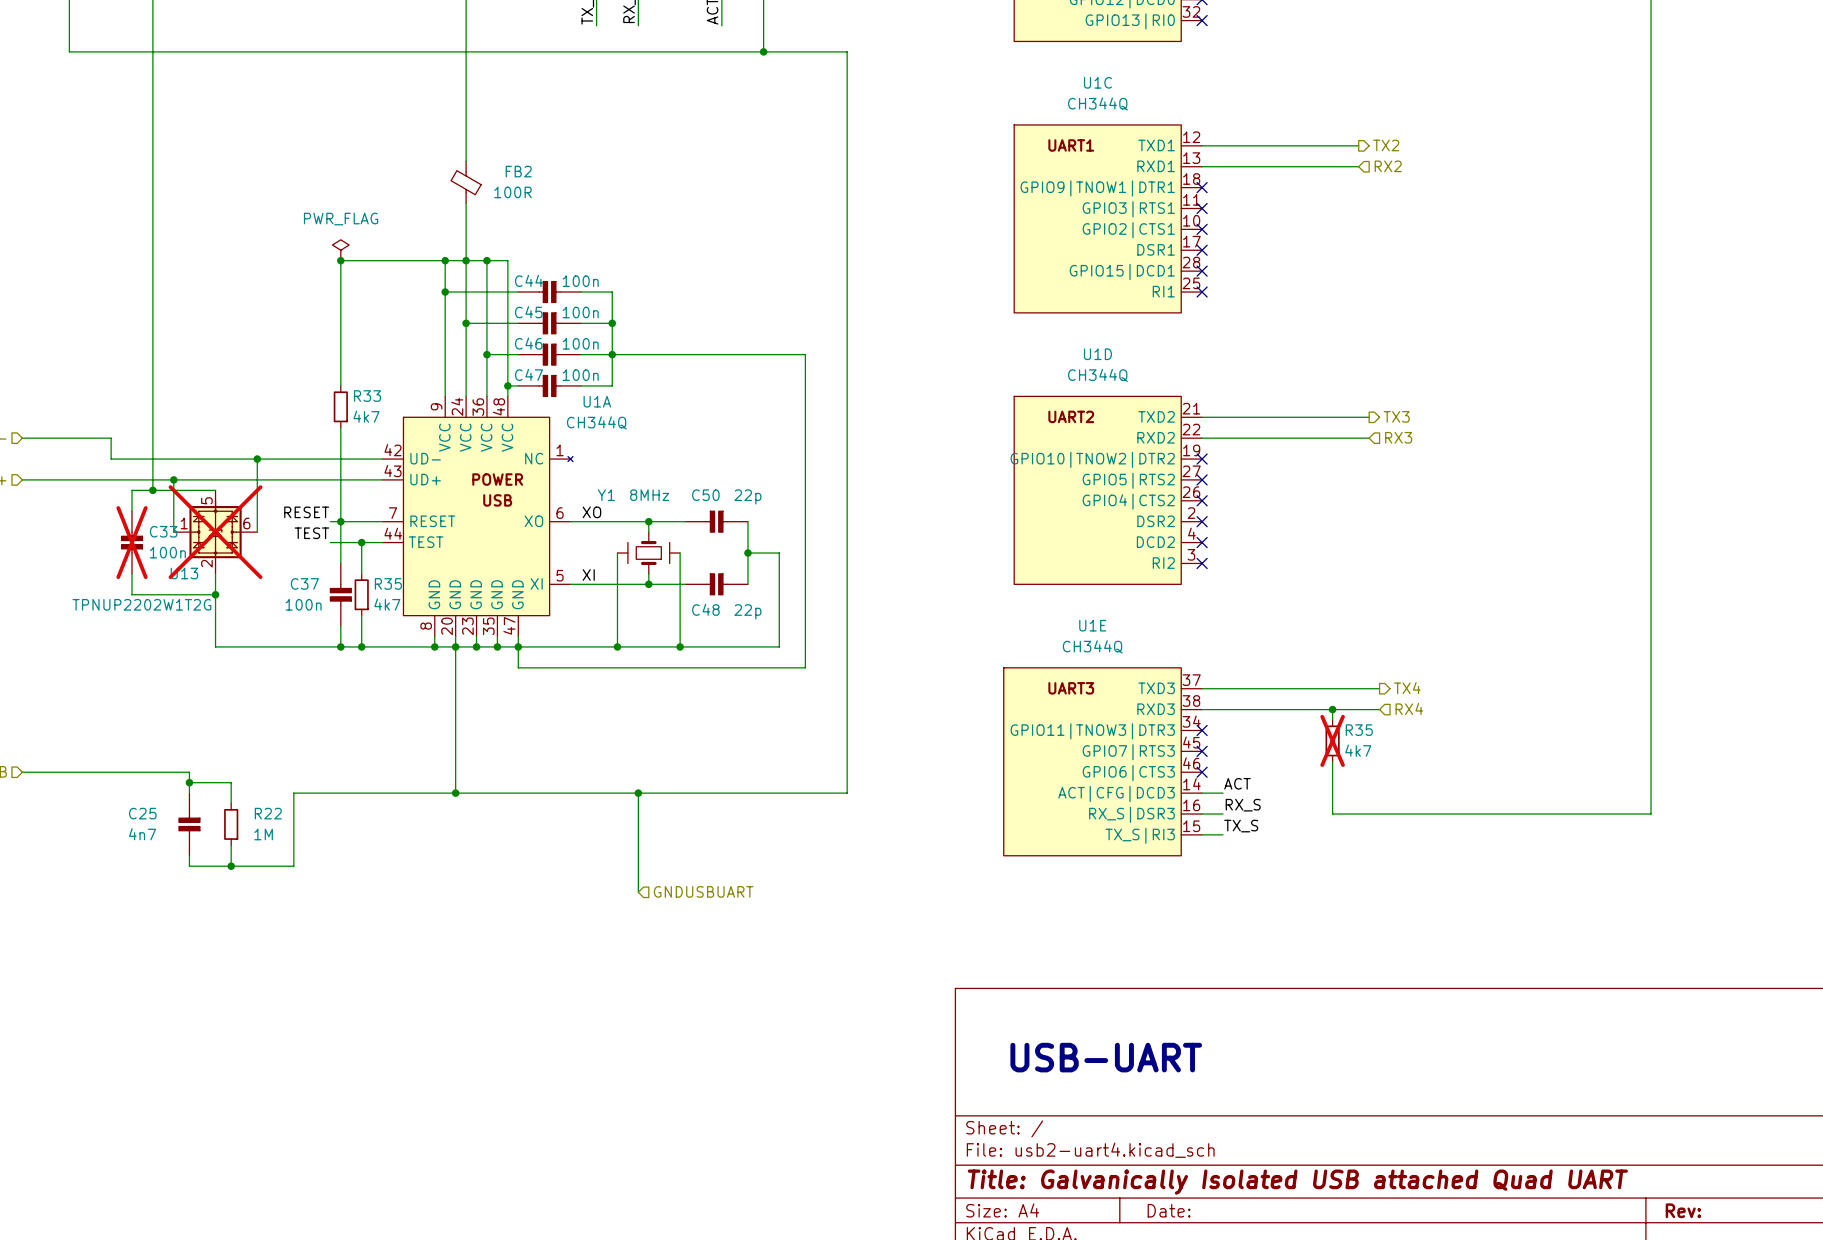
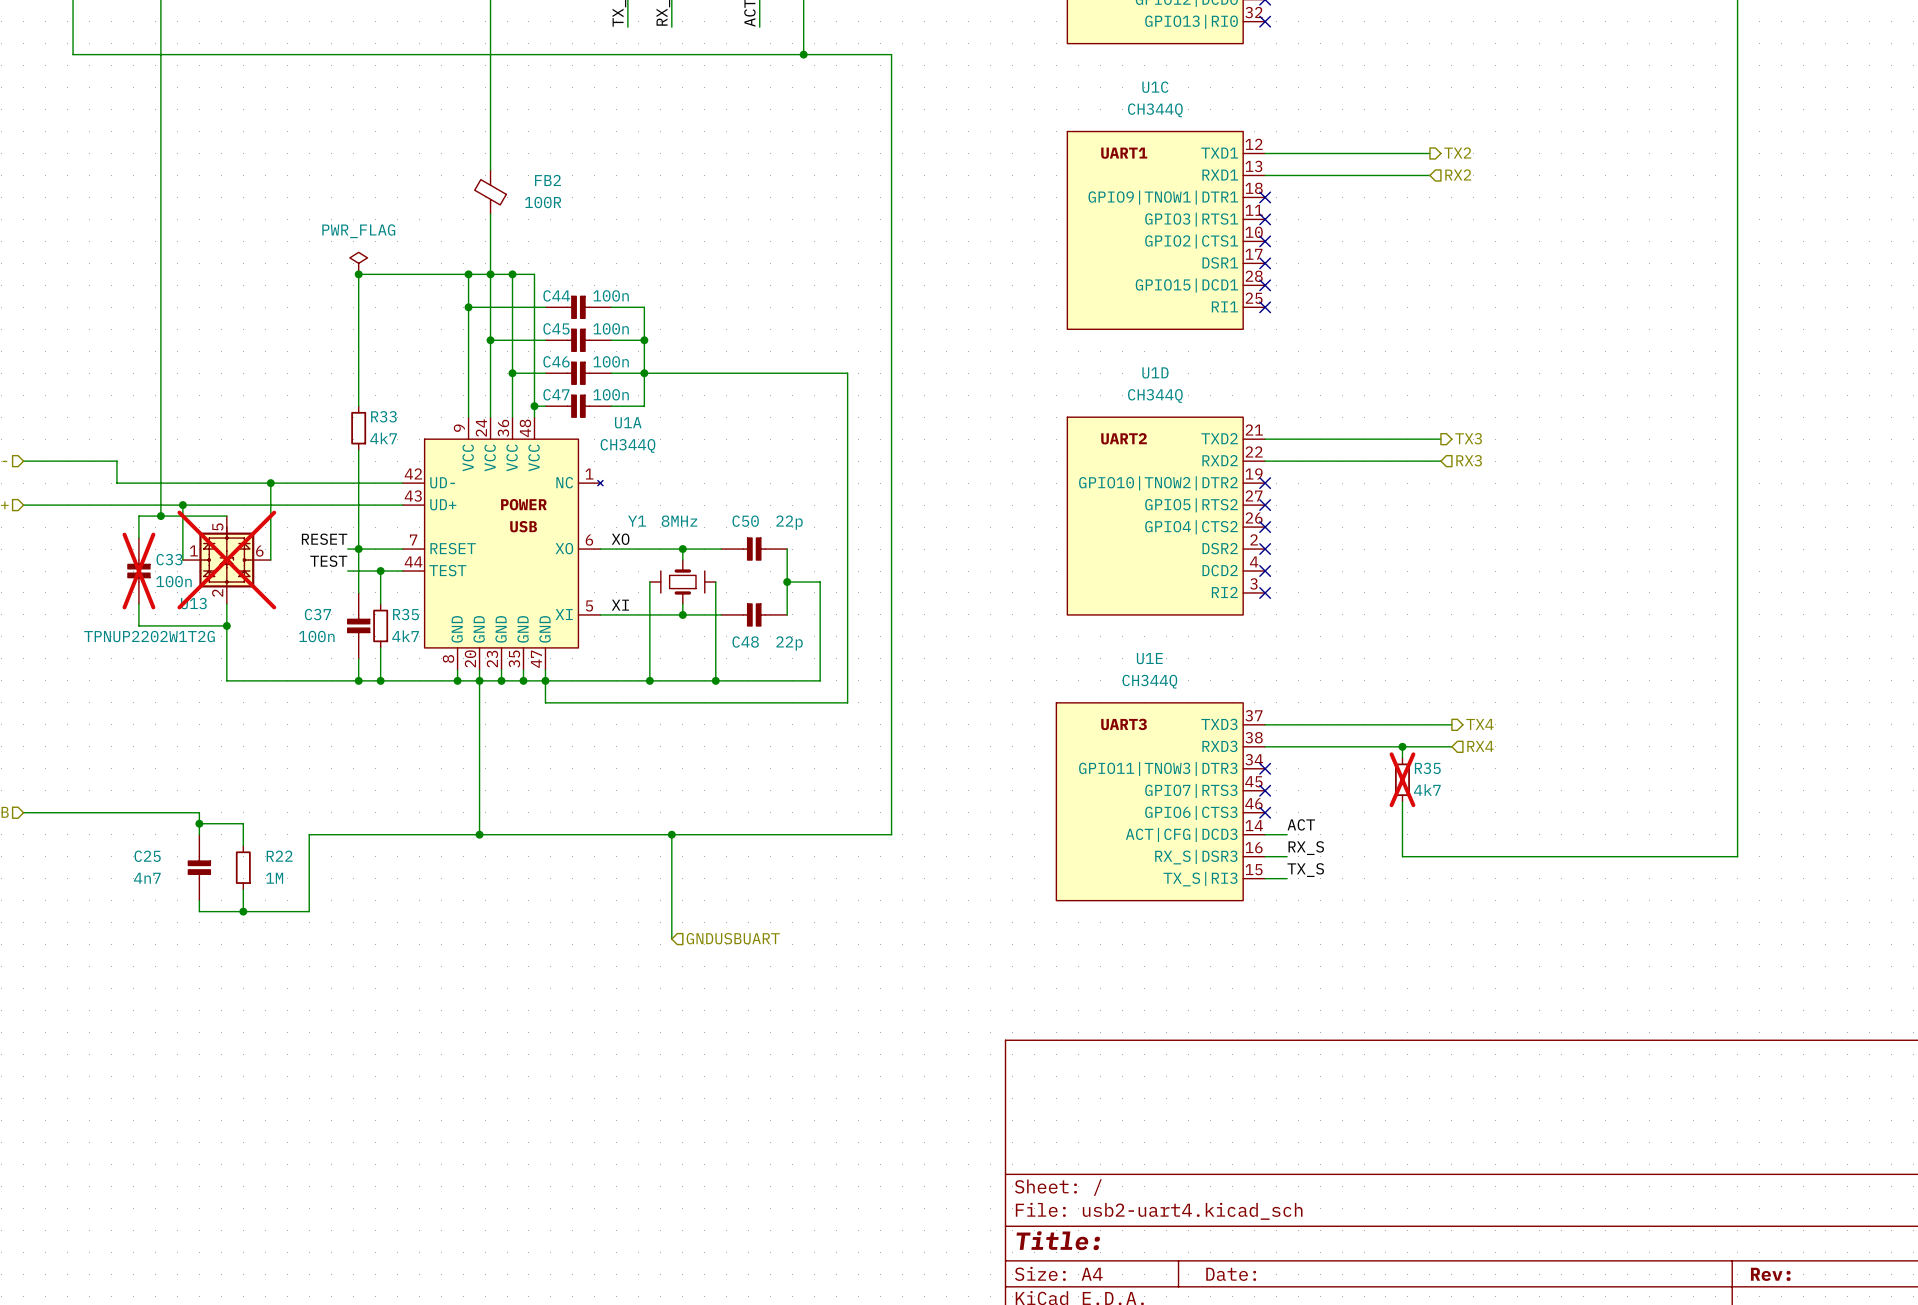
text: USB-UART (1106, 1057) -> none
title block: Title: Galvanically Isolated USB attached Quad UART (1297, 1182) -> Title: (1058, 1240)

